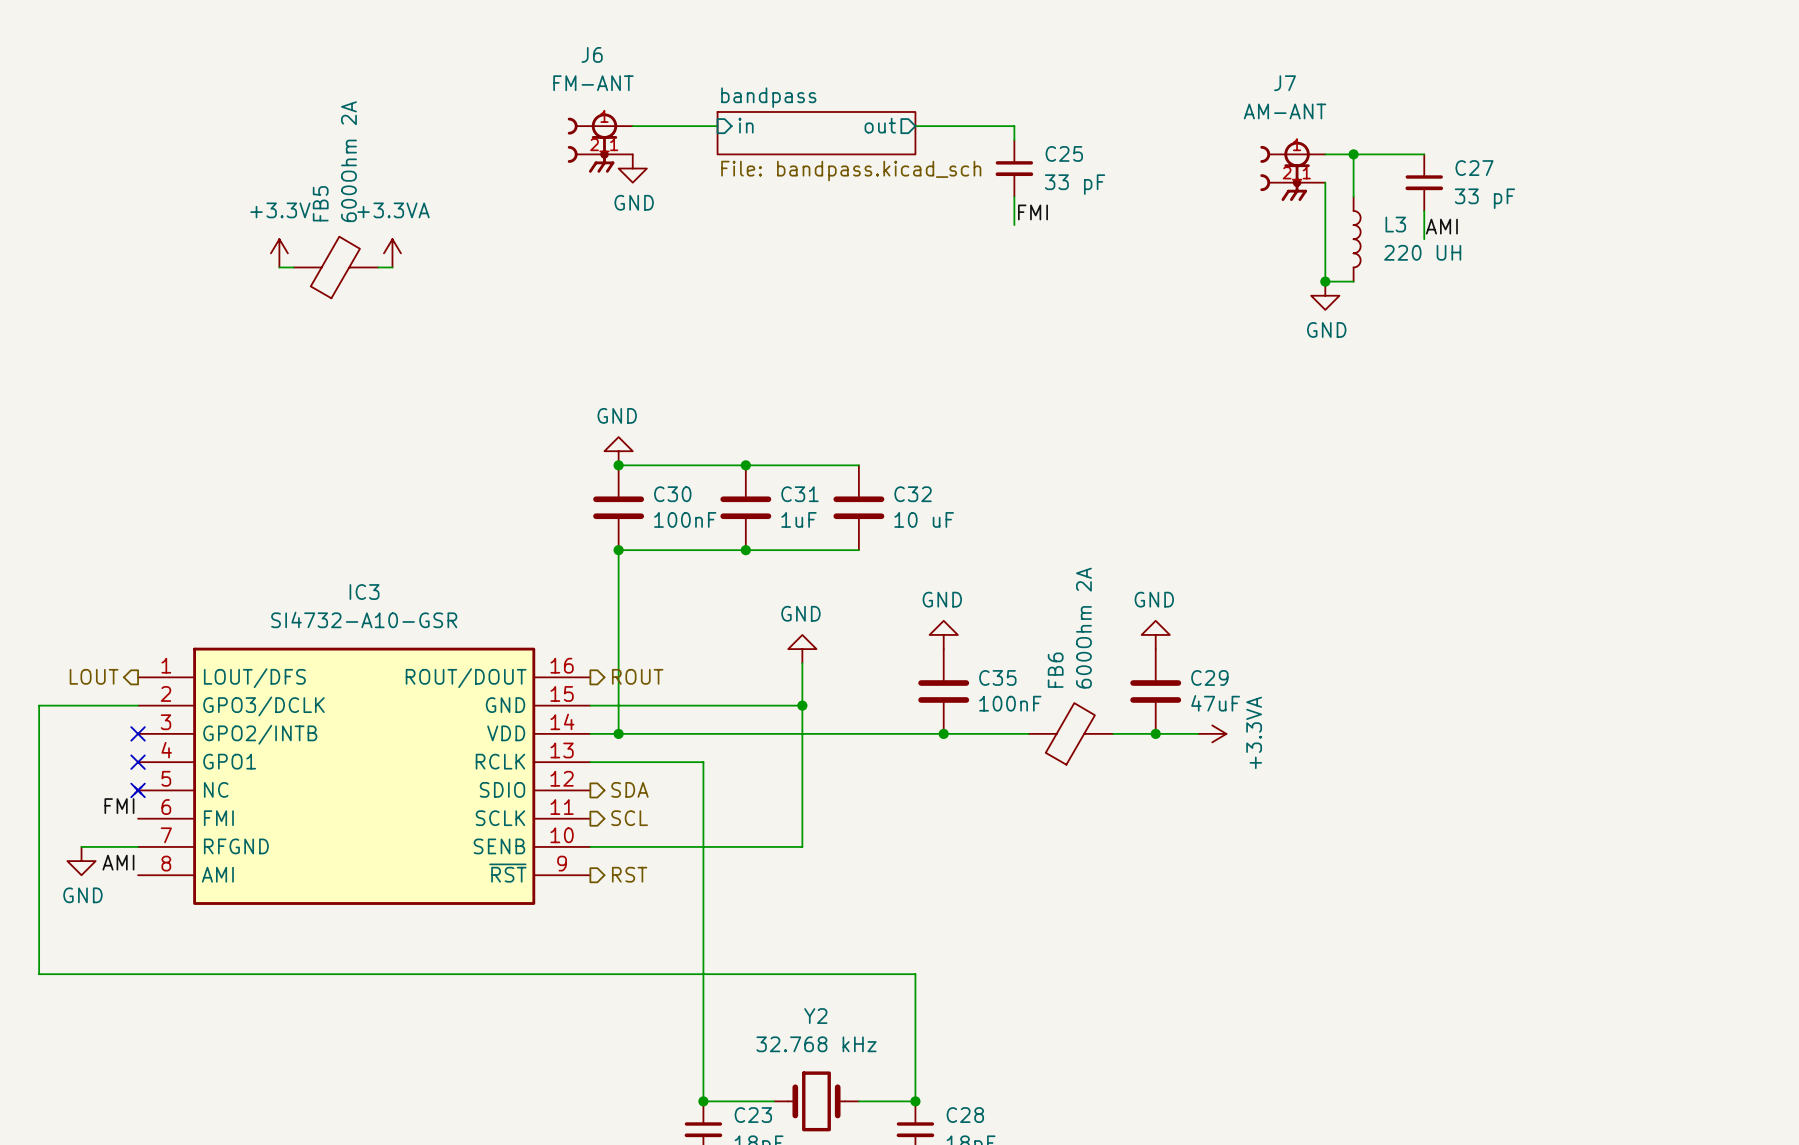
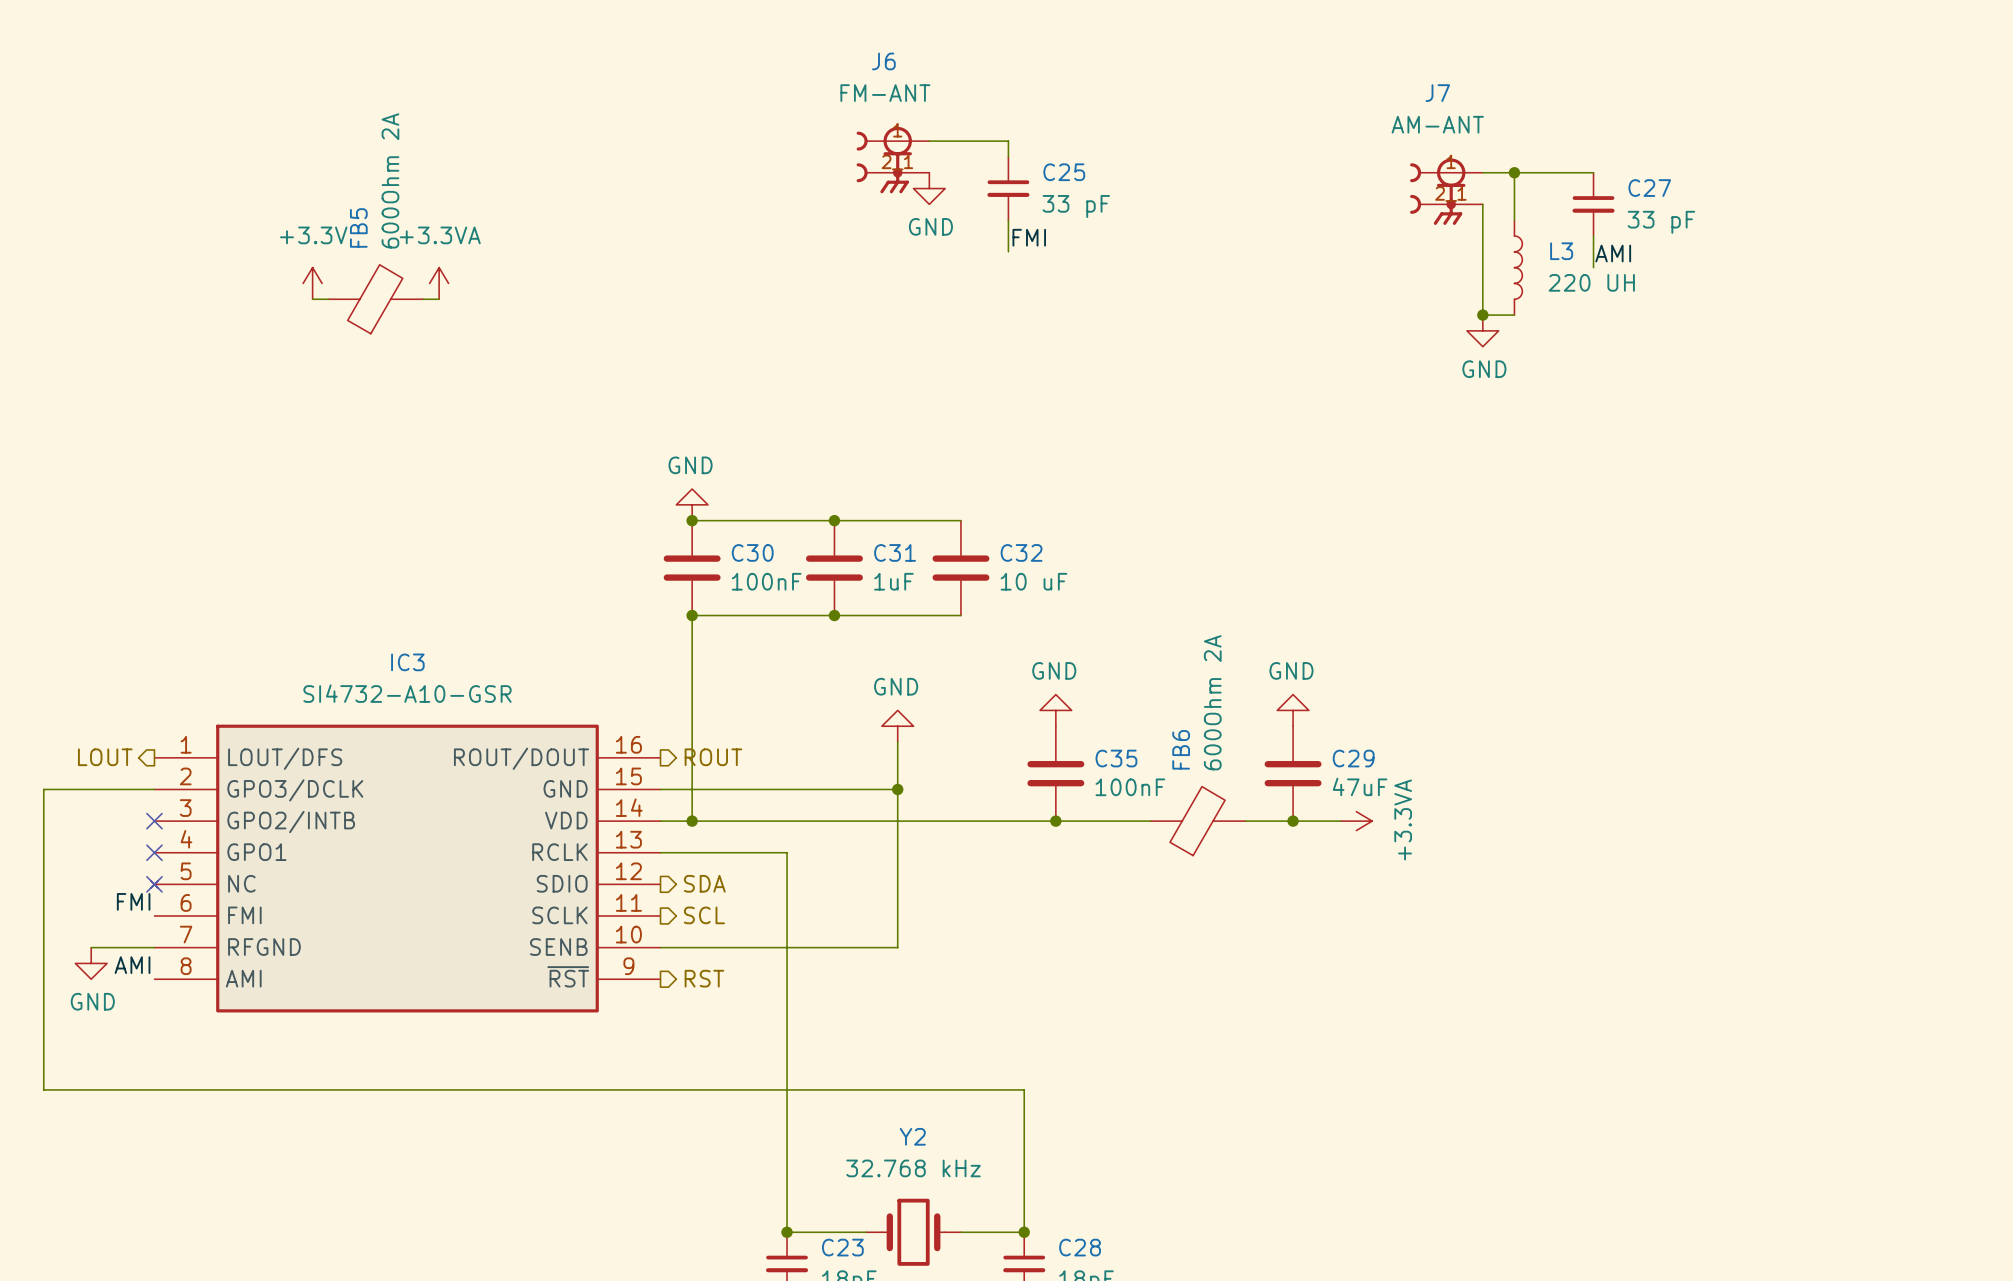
sheet pin: in (746, 125) -> none
sheet pin: out (880, 125) -> none
wire: (632, 126) (717, 126) -> none
wire: none -> (929, 141) (1008, 141) (1008, 156)
wire: (915, 126) (1014, 126) (1014, 140) -> none
sheet bandpass: File: bandpass.kicad_sch (816, 133) -> none
J6 position: (600, 143) -> (892, 160)
power symbol position: GND (632, 168) -> GND (929, 188)
C25 position: (1014, 168) -> (1008, 188)
wire: (1014, 196) (1014, 225) -> (1008, 220) (1008, 251)
label position: FMI (1032, 212) -> FMI (1029, 237)

